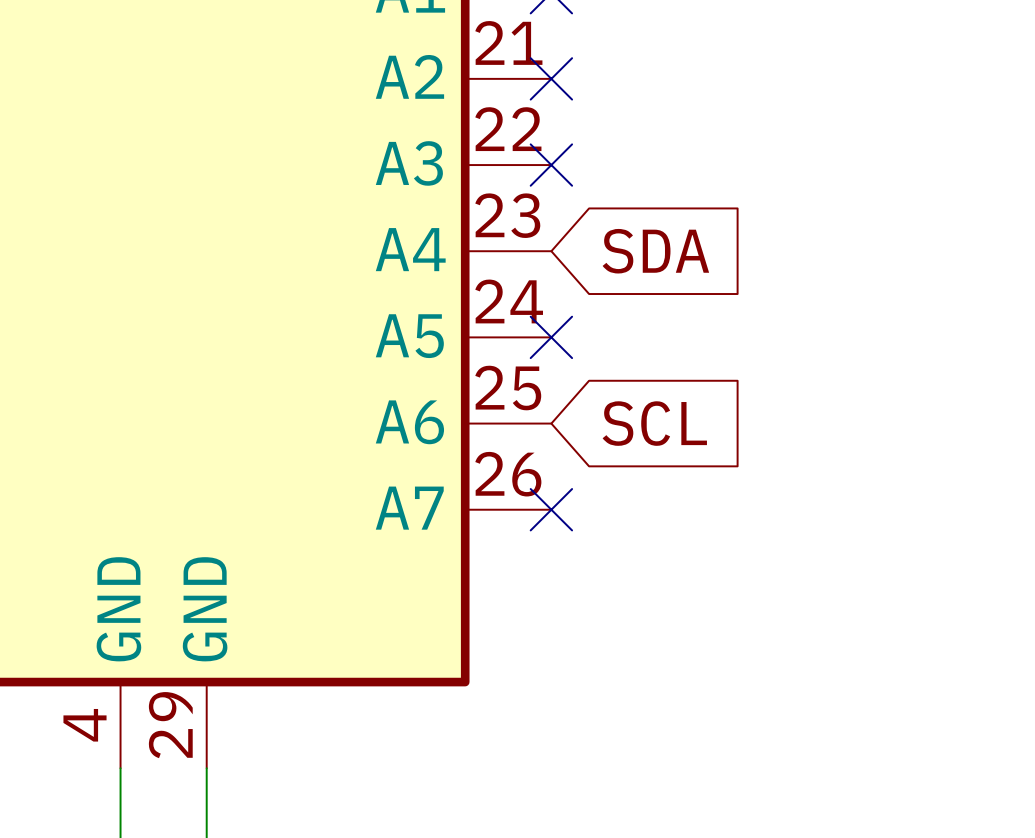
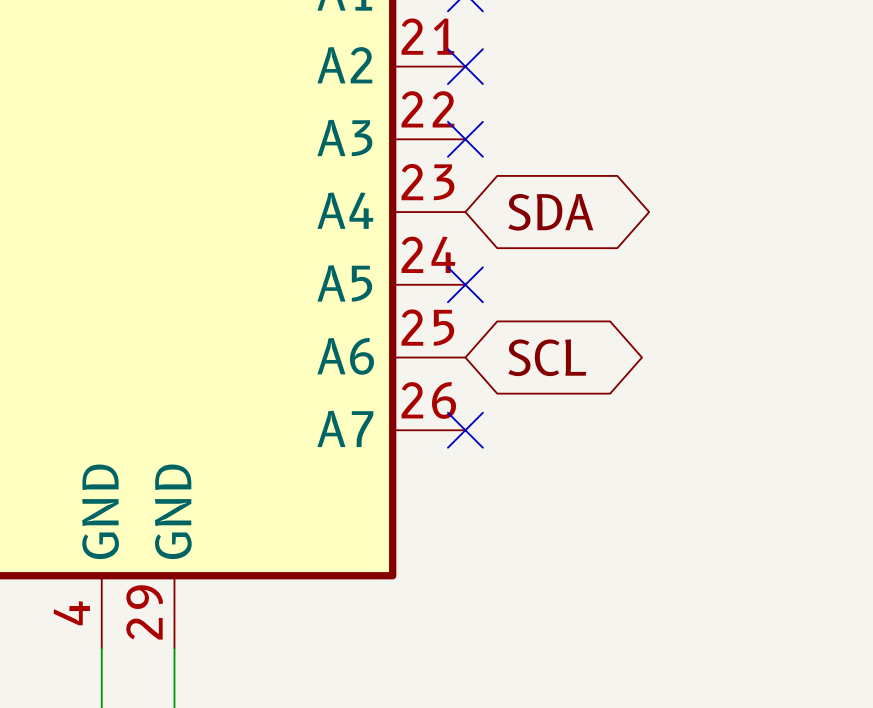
global label shape: input (655, 251) -> bidirectional (550, 212)
global label shape: input (654, 423) -> bidirectional (547, 357)

